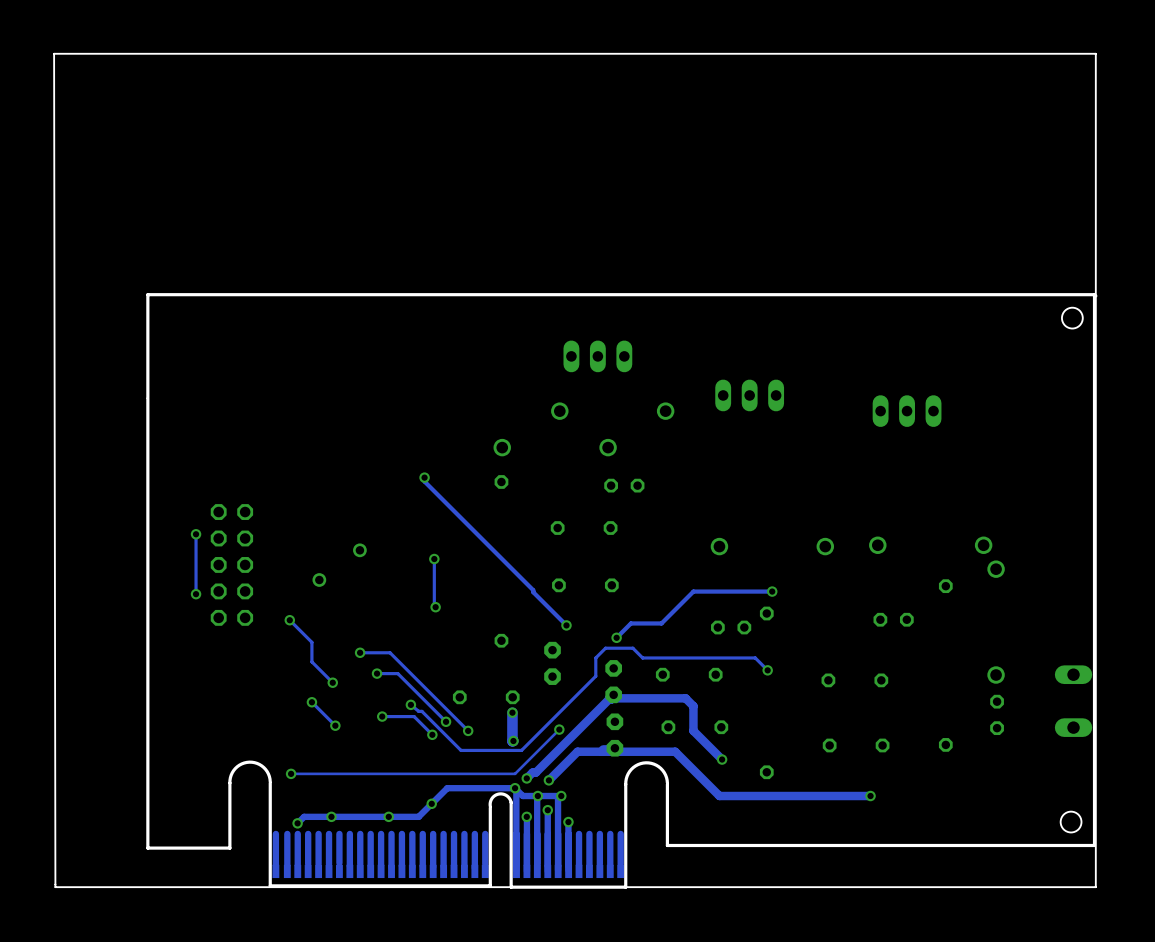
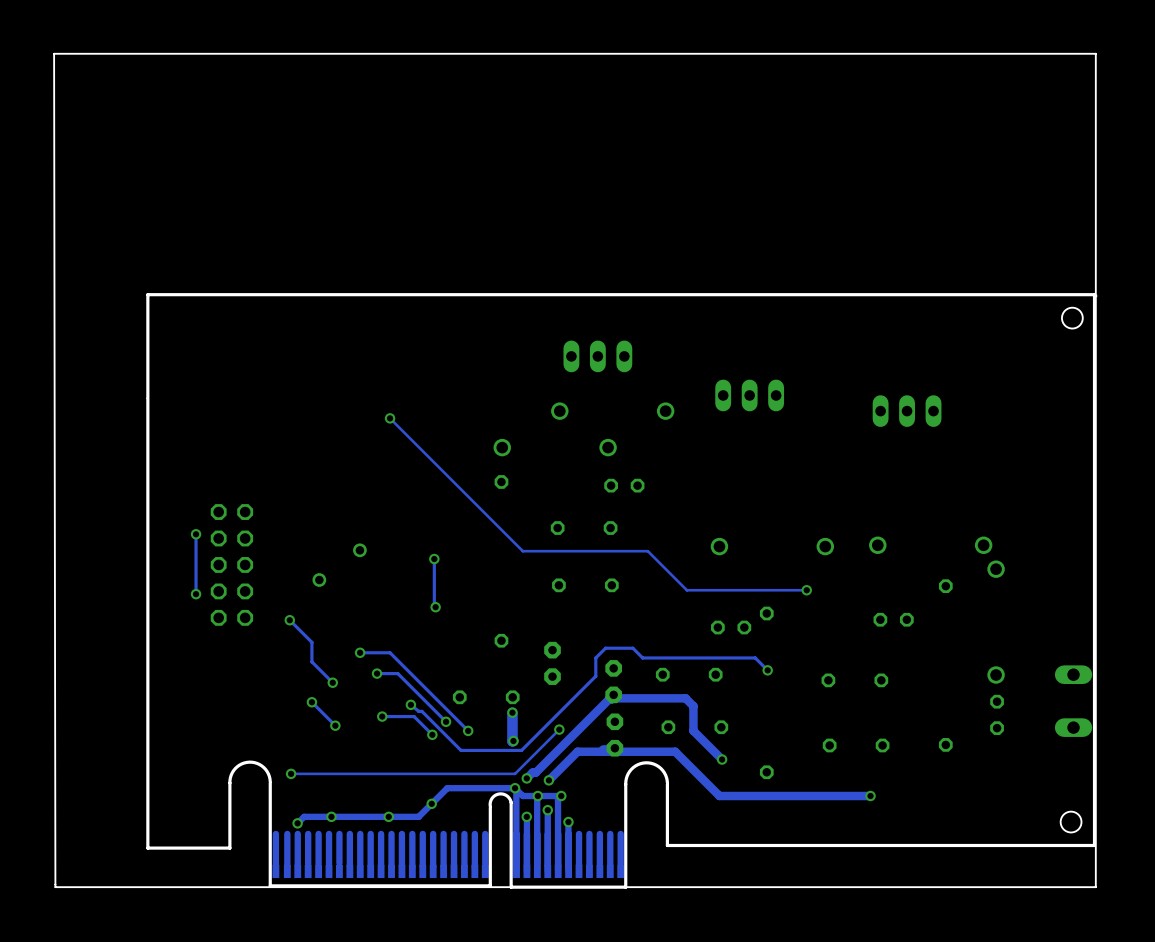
track: none -> (390, 418) (522, 551) (647, 551) (686, 590) (806, 590)
via: none -> (390, 418)
track: (424, 477) (424, 481) (566, 625) -> none
via: (424, 477) -> none
track: (772, 591) (693, 591) (661, 623) (630, 623) (616, 637) -> none
via position: (772, 591) -> (806, 590)
via: (566, 625) -> none
via: (616, 637) -> none

